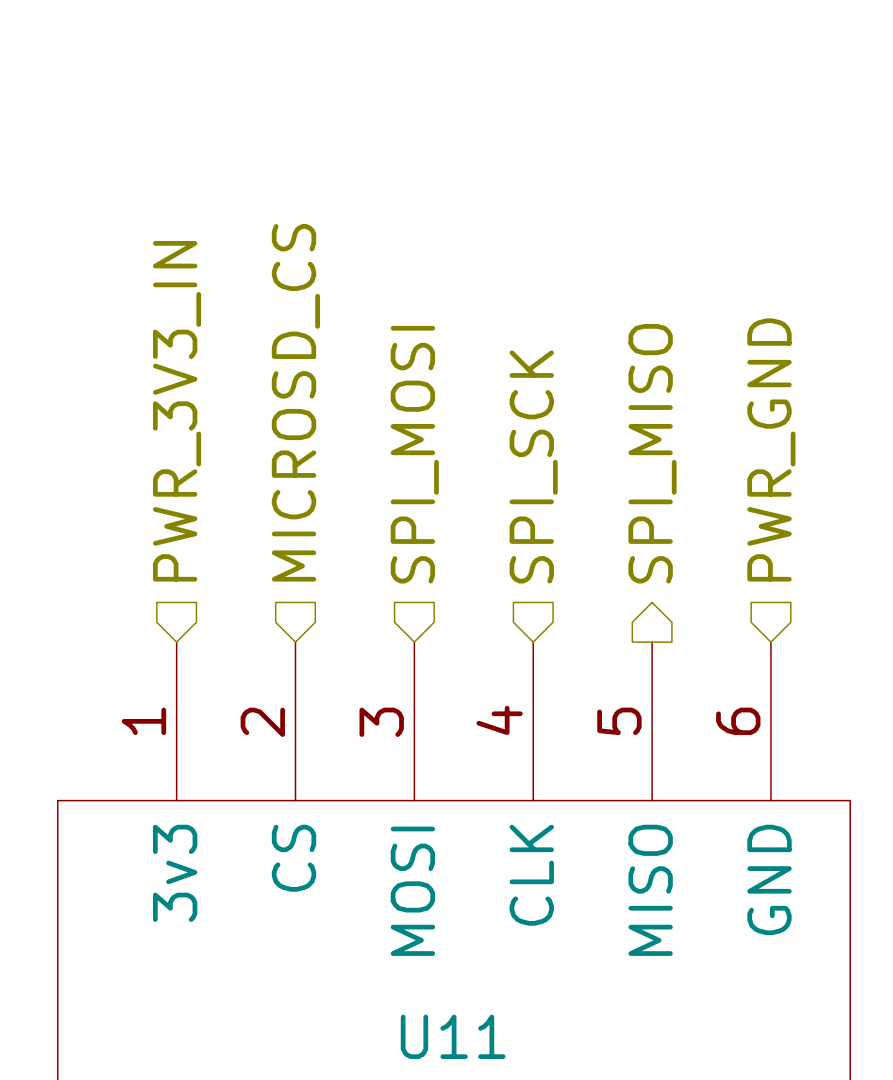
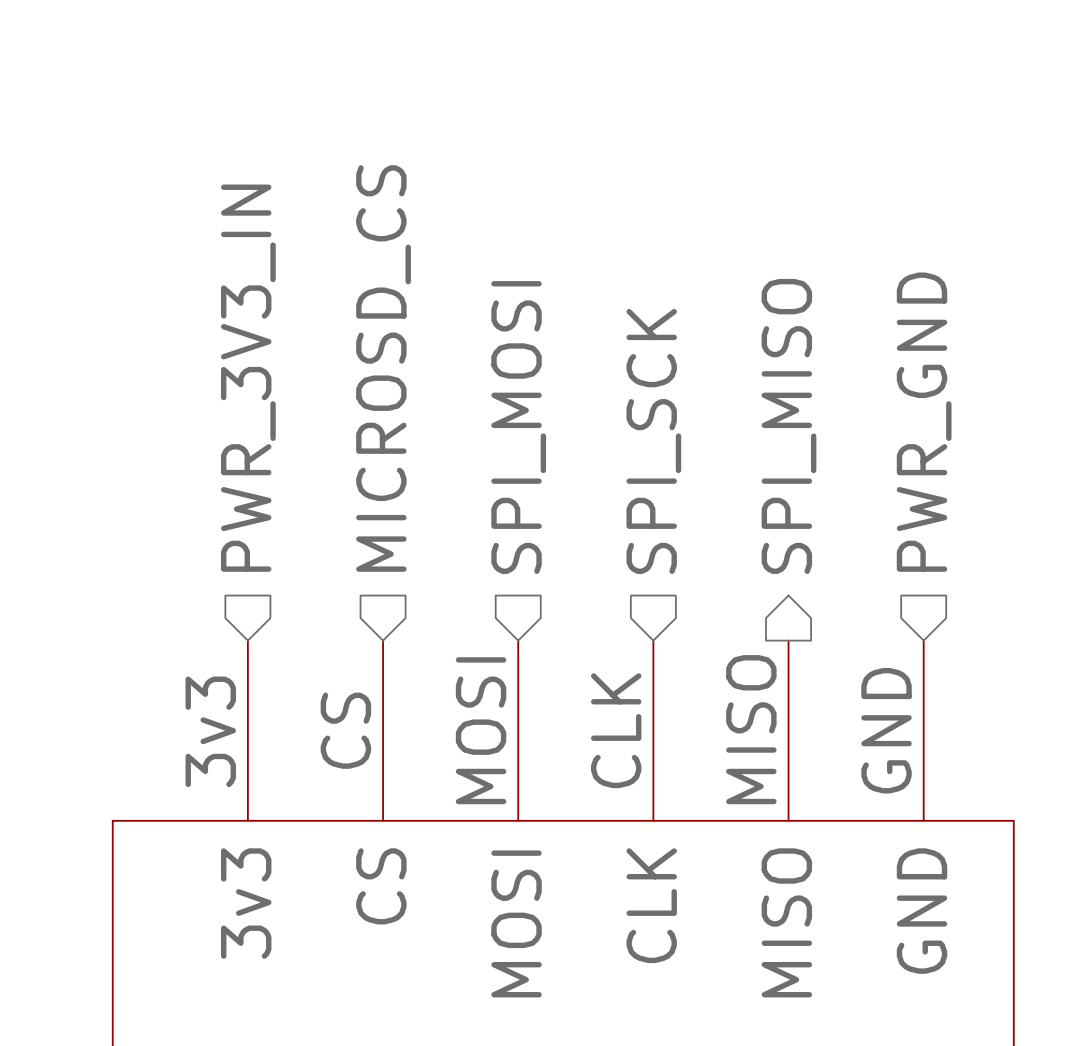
U11 pin number: 4 (499, 720) -> CLK (616, 730)
U11 pin number: 1 (143, 721) -> 3v3 (210, 731)
U11 pin number: 5 (619, 721) -> MISO (751, 729)
U11 pin number: 6 (738, 721) -> GND (886, 730)
U11 pin number: 2 (262, 722) -> CS (345, 730)
U11 pin number: 3 (381, 722) -> MOSI (481, 730)

